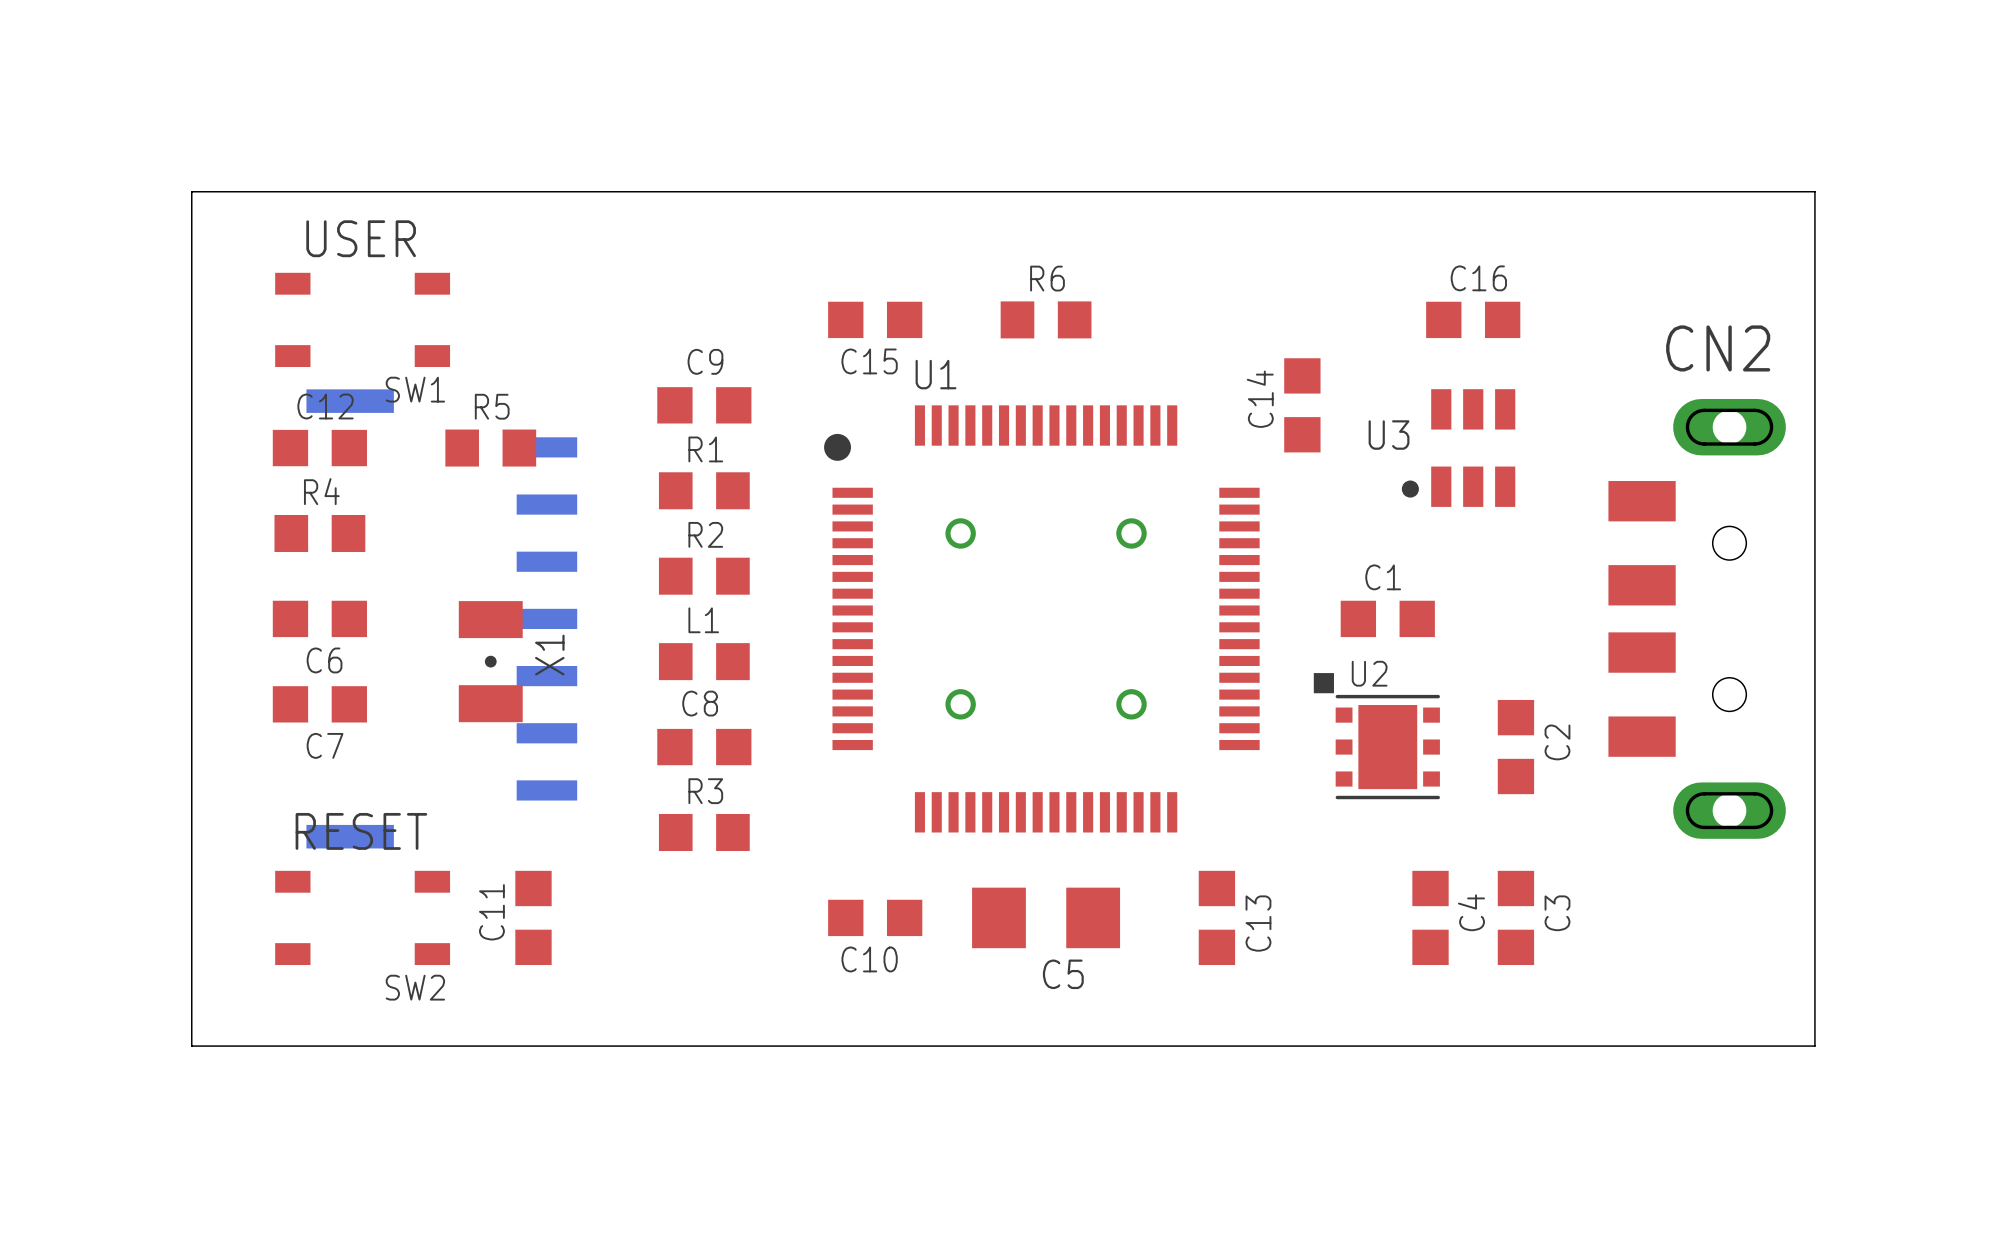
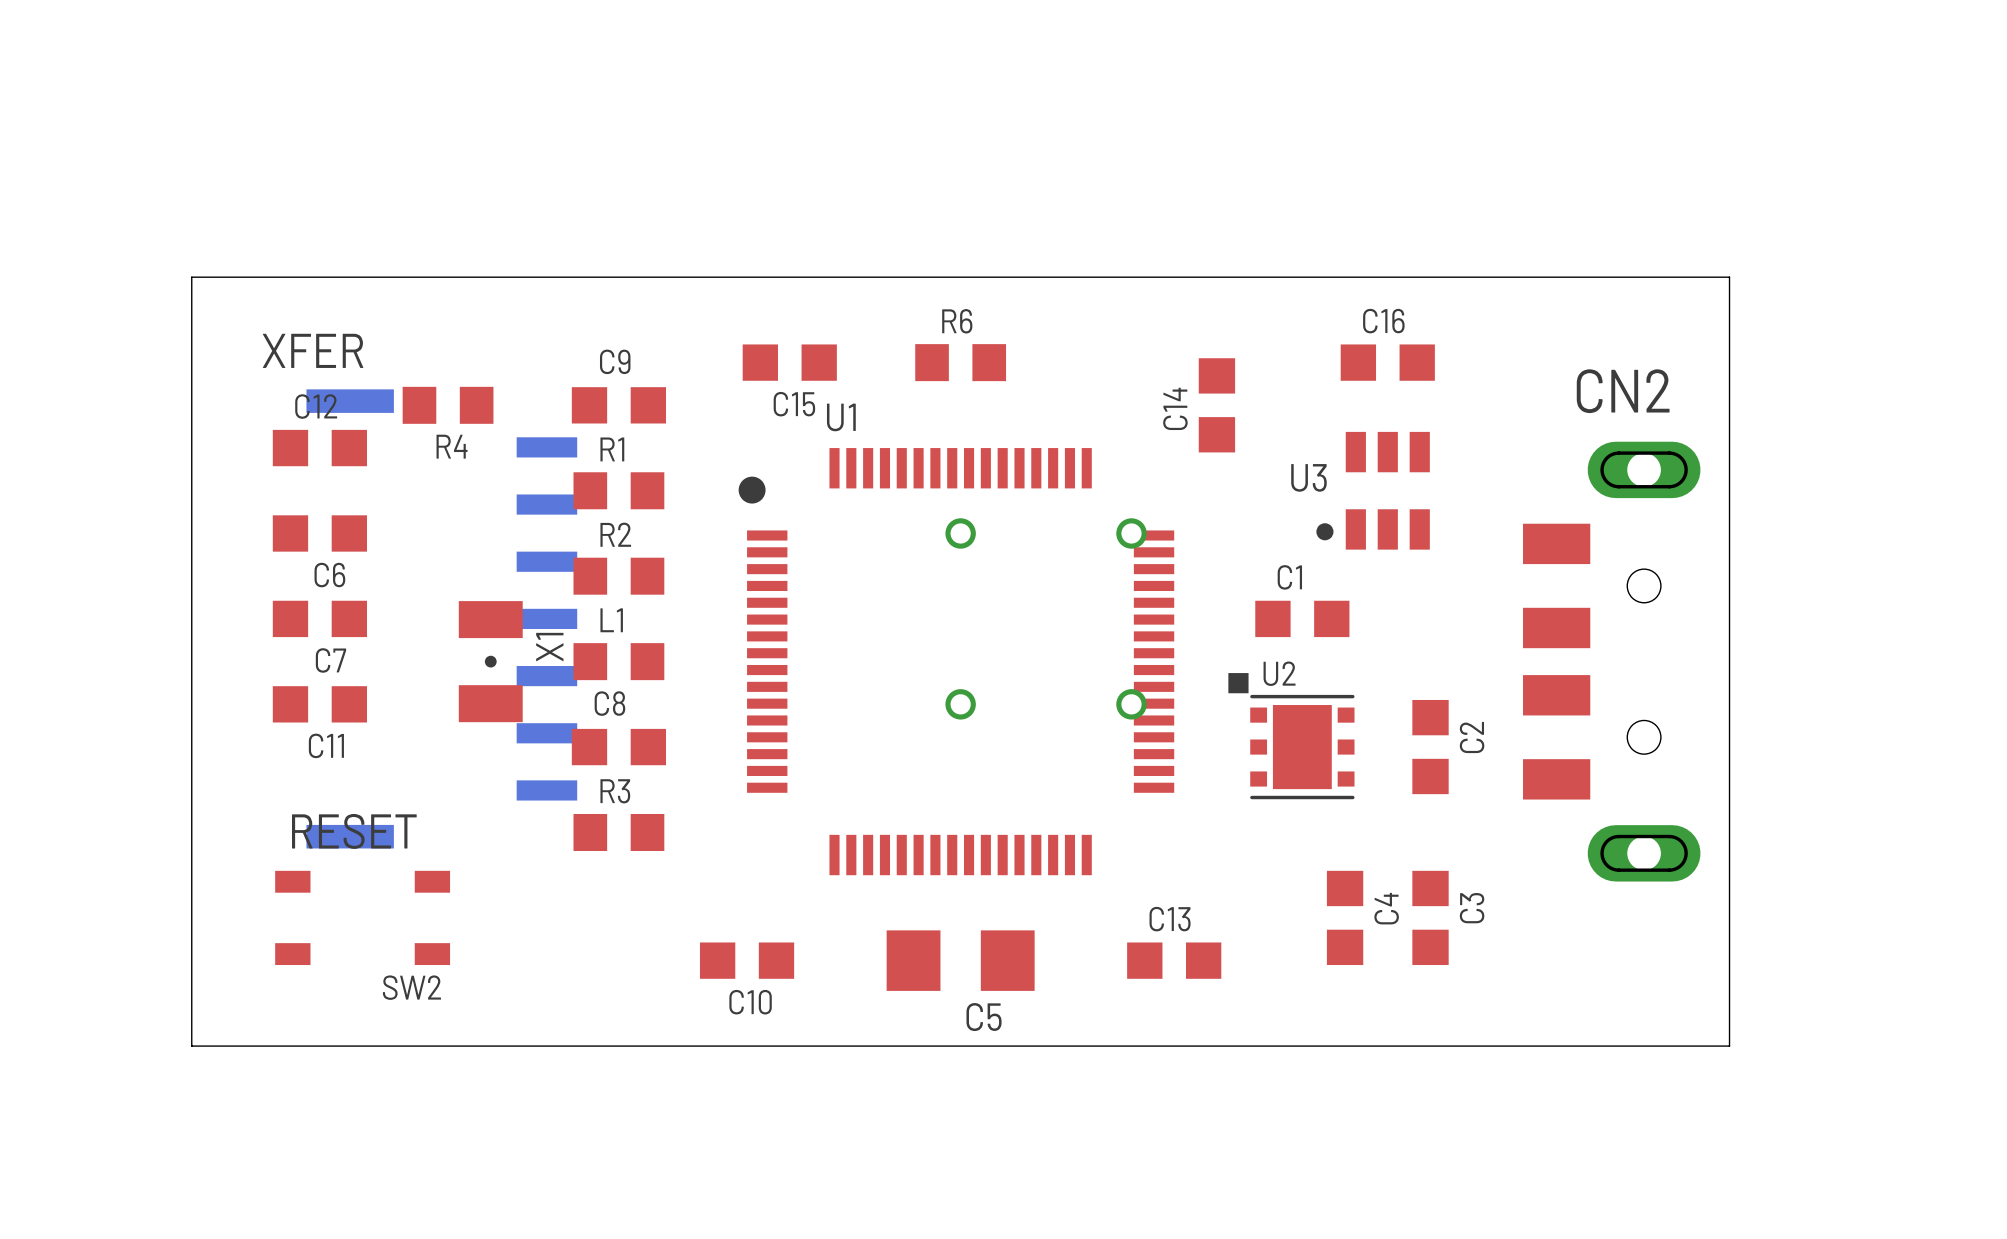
text: USER (361, 238) -> none
board edge: (191, 277) (191, 191) (1814, 191) (1814, 1046) (1729, 1046) -> (191, 277) (1729, 277) (1729, 1046)
SW1: (362, 319) -> none
C15 position: (875, 319) -> (789, 362)
R6 position: (1046, 319) -> (960, 362)
C16 position: (1473, 319) -> (1387, 362)
text: none -> XFER (313, 350)
C9 position: (704, 405) -> (618, 405)
C14 position: (1302, 405) -> (1216, 405)
R5: (490, 448) -> none
U3 position: (1458, 448) -> (1373, 490)
R1 position: (704, 490) -> (618, 490)
R4 name position: R4 (321, 491) -> R4 (452, 446)
R4 position: (319, 533) -> (448, 405)
C6: none -> (319, 533)
R2 position: (704, 576) -> (618, 576)
U1 position: (1041, 618) -> (956, 661)
C1 position: (1387, 618) -> (1302, 618)
CN2 position: (1697, 618) -> (1611, 661)
C6 name: C6 (324, 660) -> C7 (330, 660)
L1 position: (704, 661) -> (618, 661)
U2 position: (1376, 736) -> (1291, 736)
C7 name: C7 (325, 745) -> C11 (326, 745)
C8 position: (704, 747) -> (618, 747)
C2 position: (1515, 747) -> (1430, 747)
R3 position: (704, 832) -> (618, 832)
C4 name: C4 (1471, 912) -> C3 (1472, 908)
C11: (533, 917) -> none
C10 position: (875, 917) -> (747, 960)
C5 position: (1046, 917) -> (960, 960)
C13 rotation: 0° (1216, 917) -> 90° clockwise (1174, 960)
C13 position: (1216, 917) -> (1174, 960)
C4: none -> (1345, 917)
C3: (1515, 917) -> none

